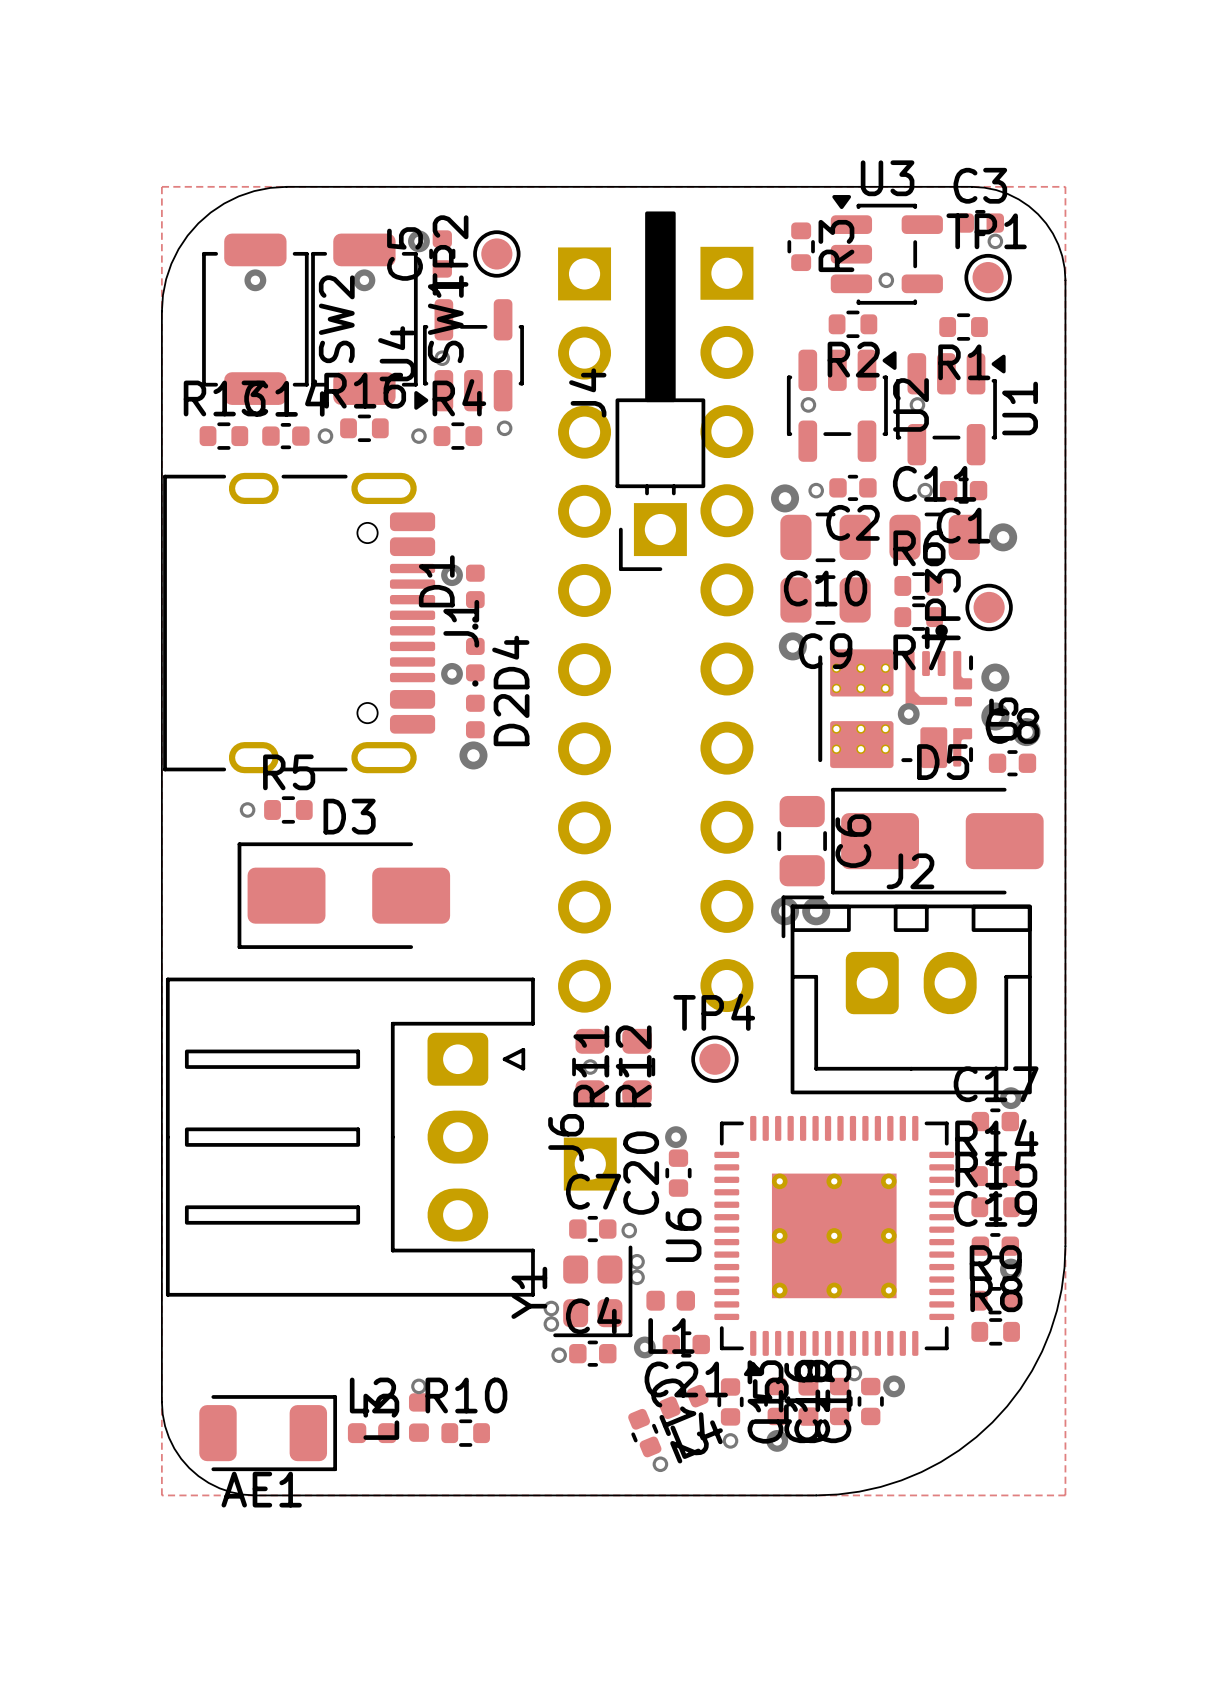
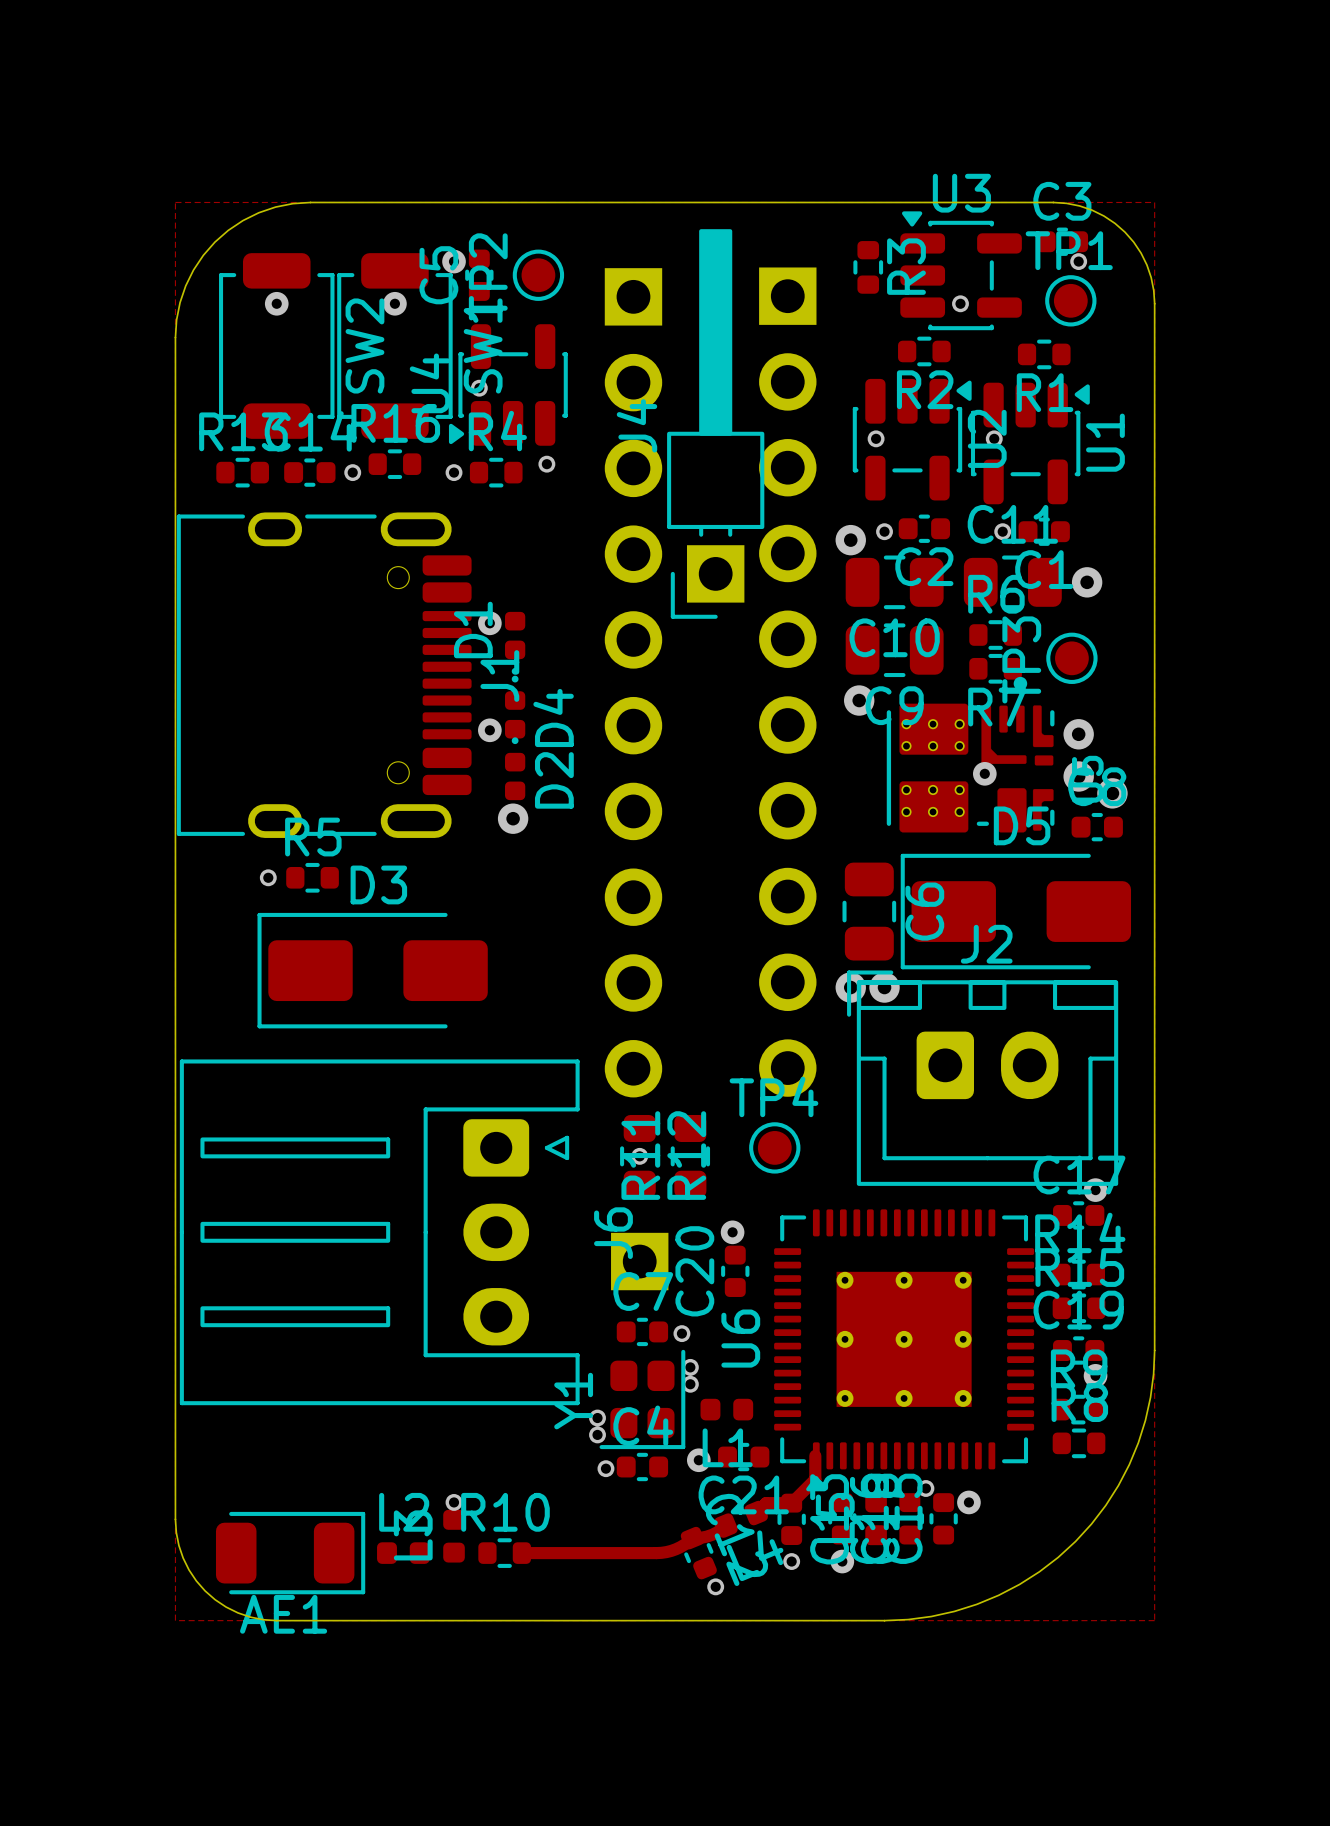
track: none -> (815, 1455) (815, 1479) (791, 1503) (766, 1503) (756, 1513)
track: none -> (725, 1525) (712, 1534) (692, 1538) (676, 1549) (661, 1552) (521, 1553)

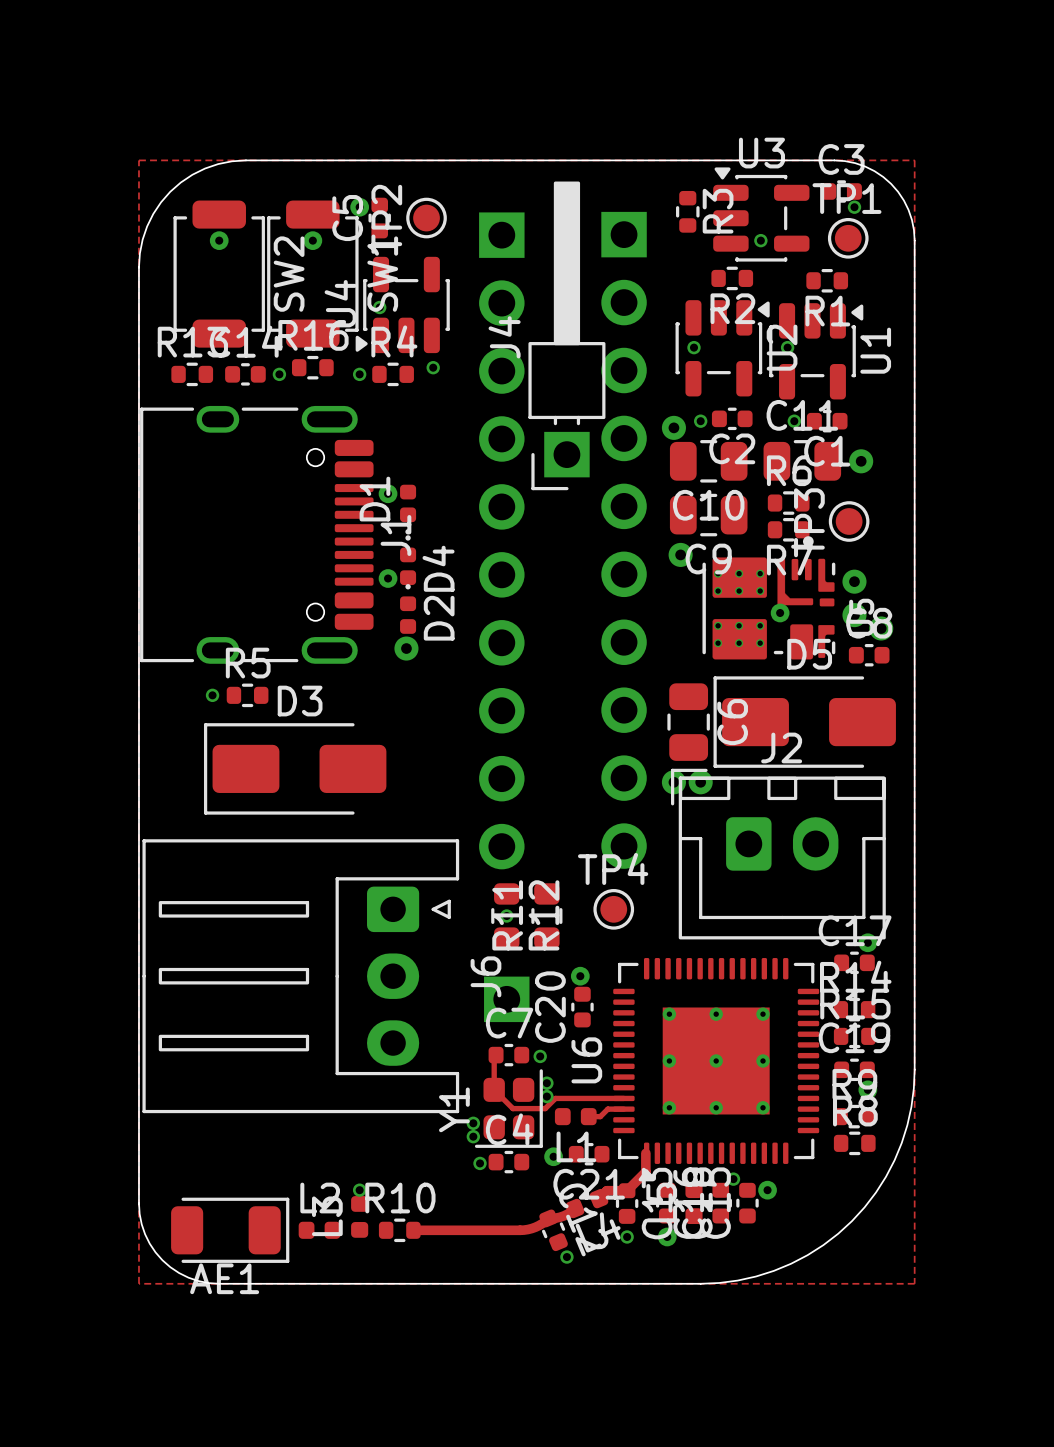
track: none -> (496, 1055) (494, 1056) (494, 1089) (512, 1108) (545, 1108) (555, 1098) (623, 1098)
track: none -> (623, 1109) (607, 1109) (600, 1116) (588, 1116)

